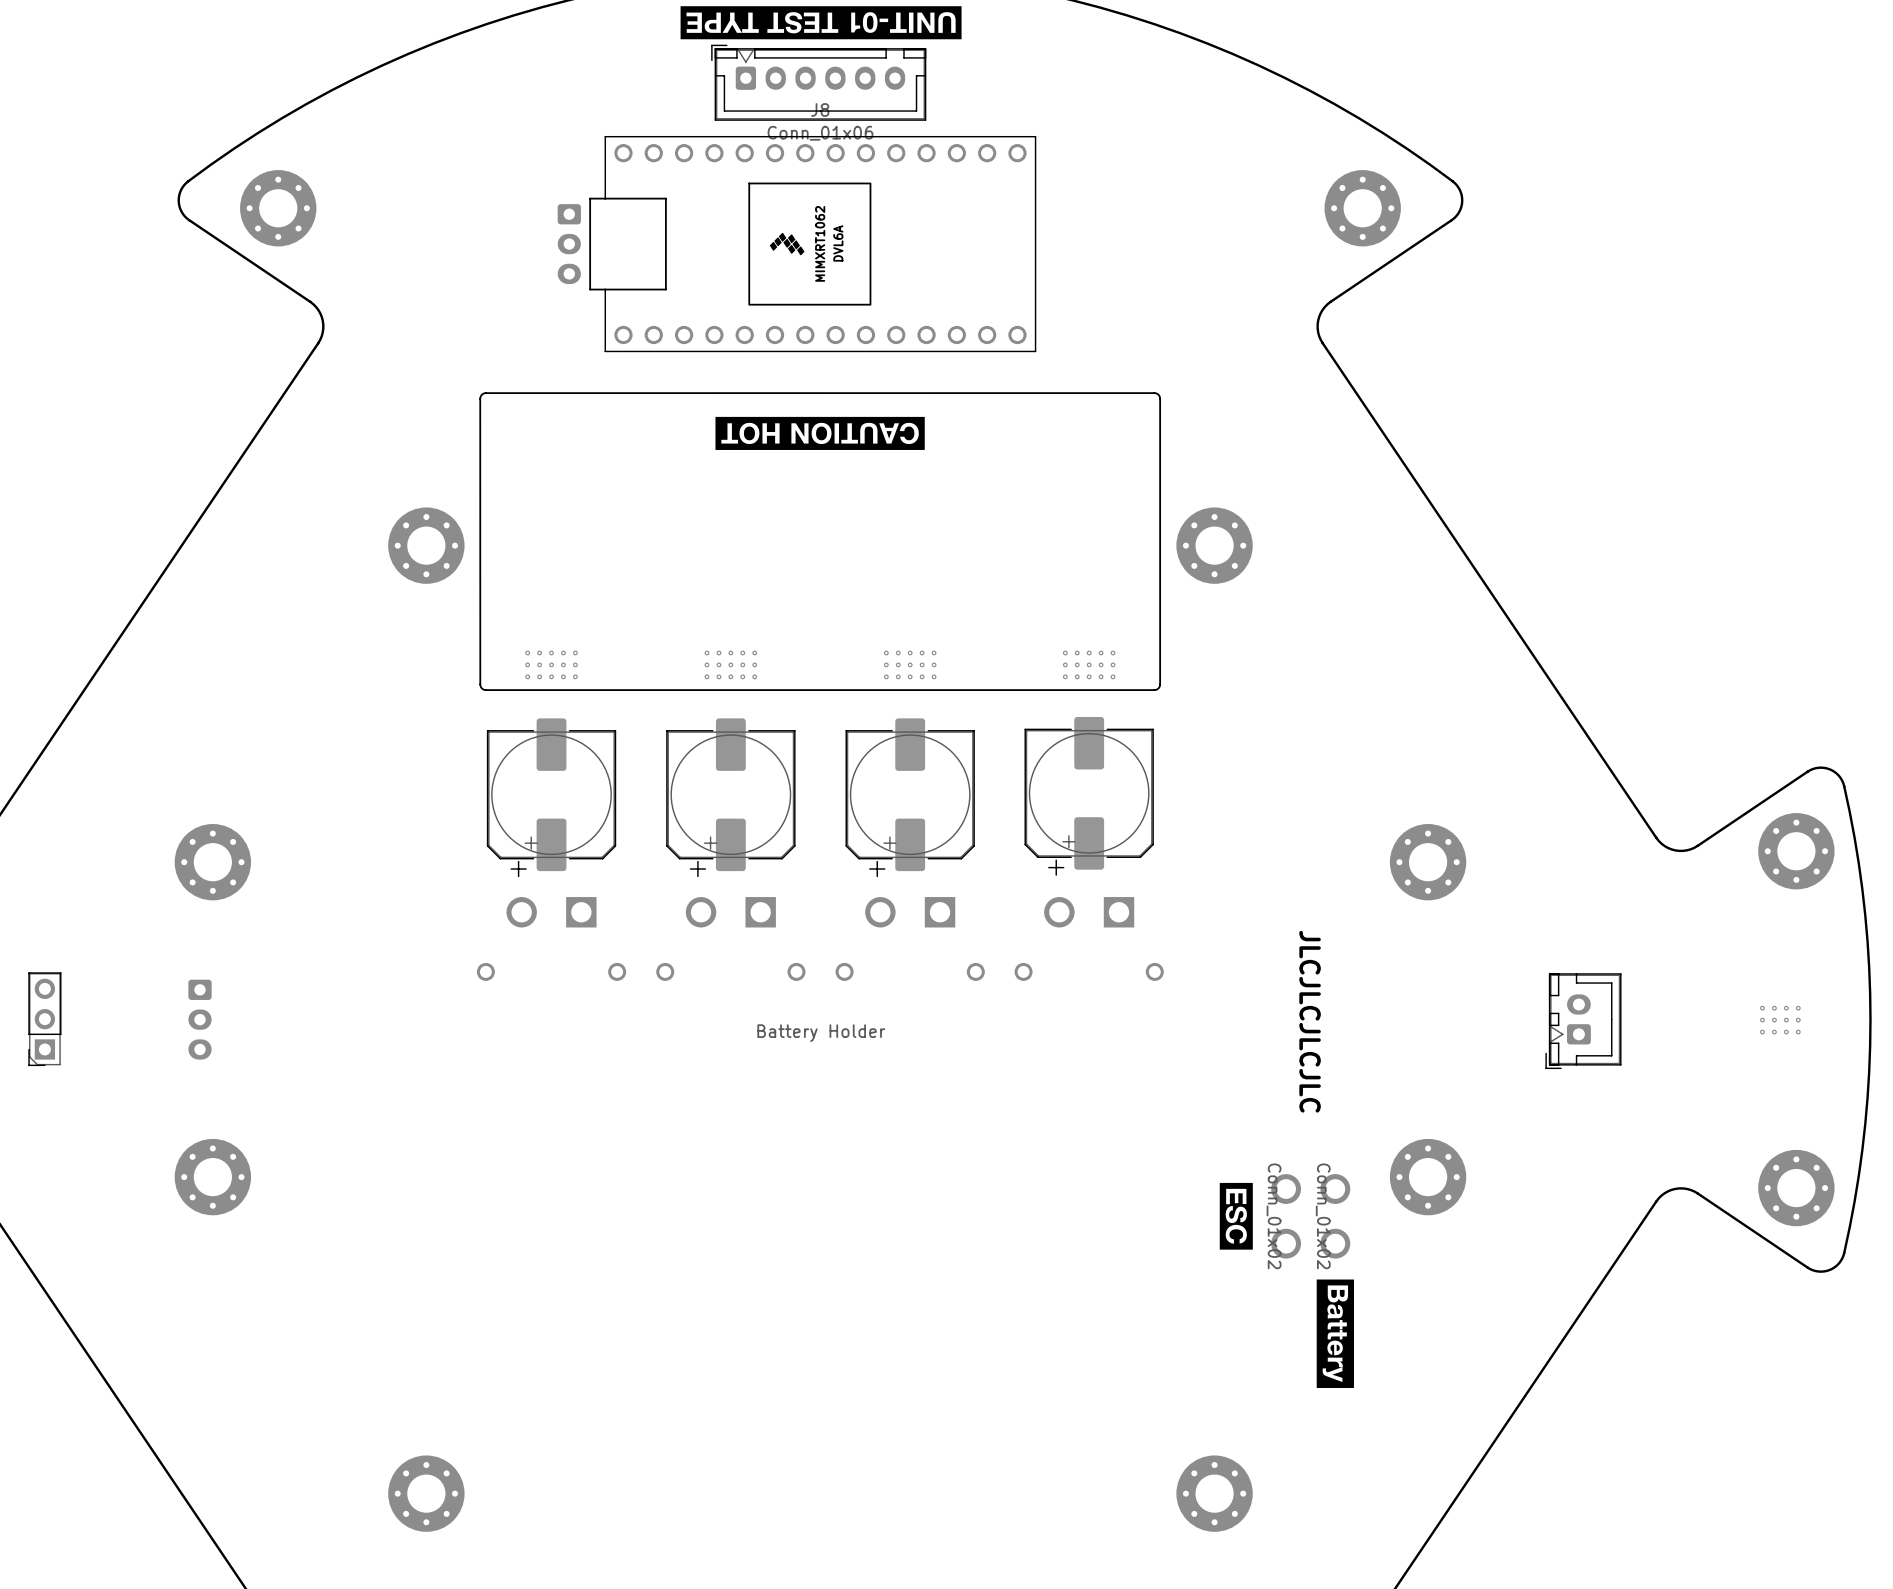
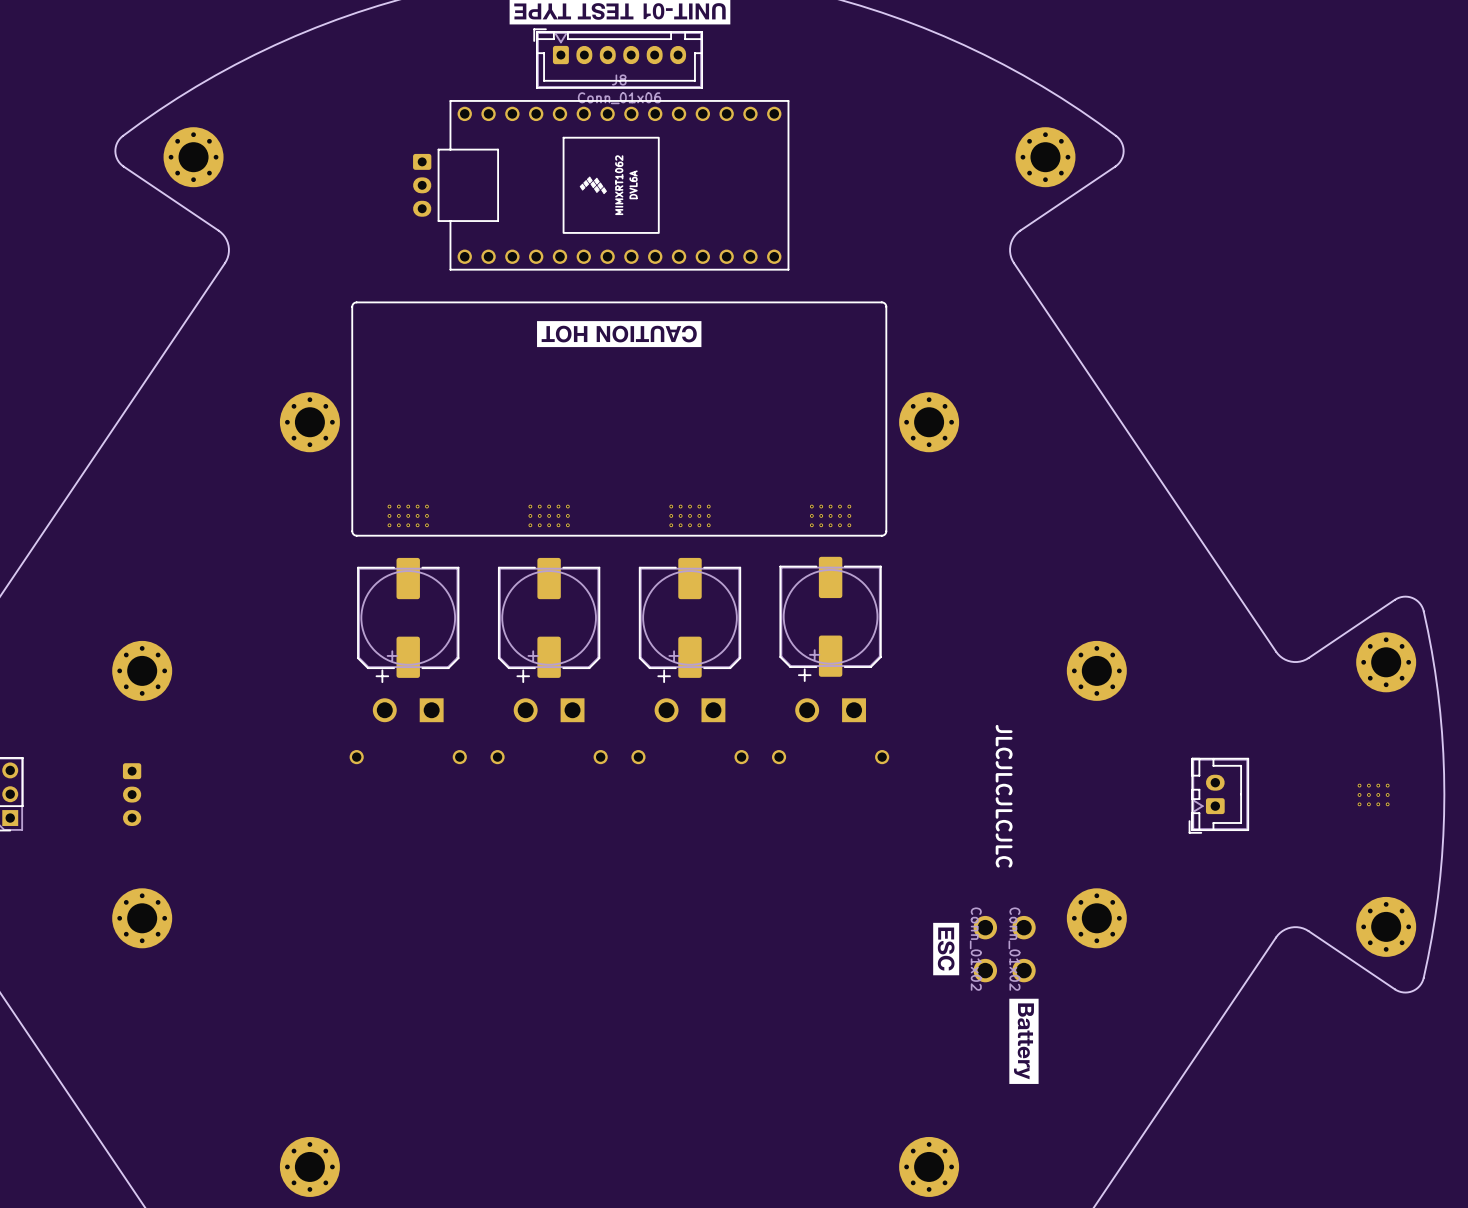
drawing: [757, 1024, 886, 1042] -> none

